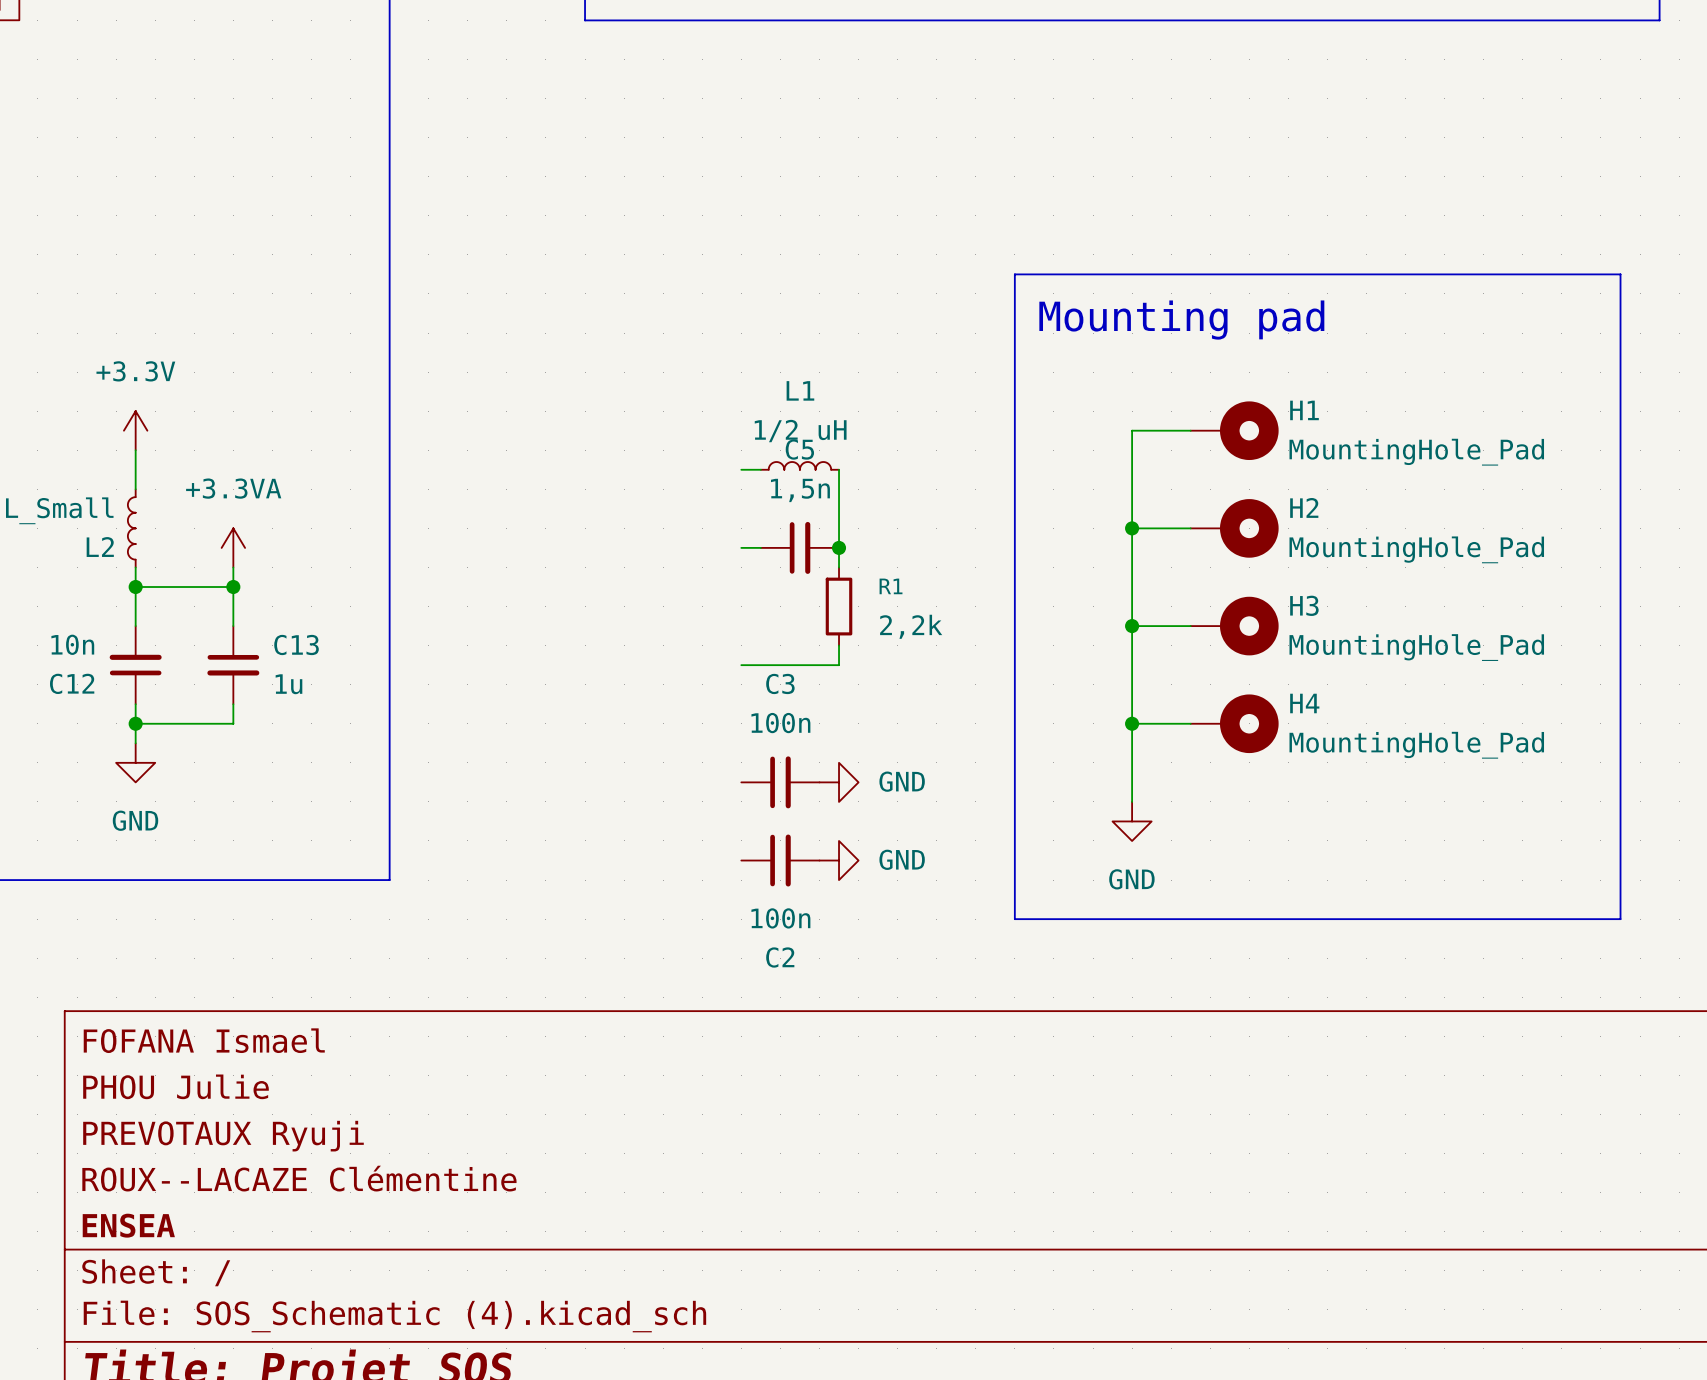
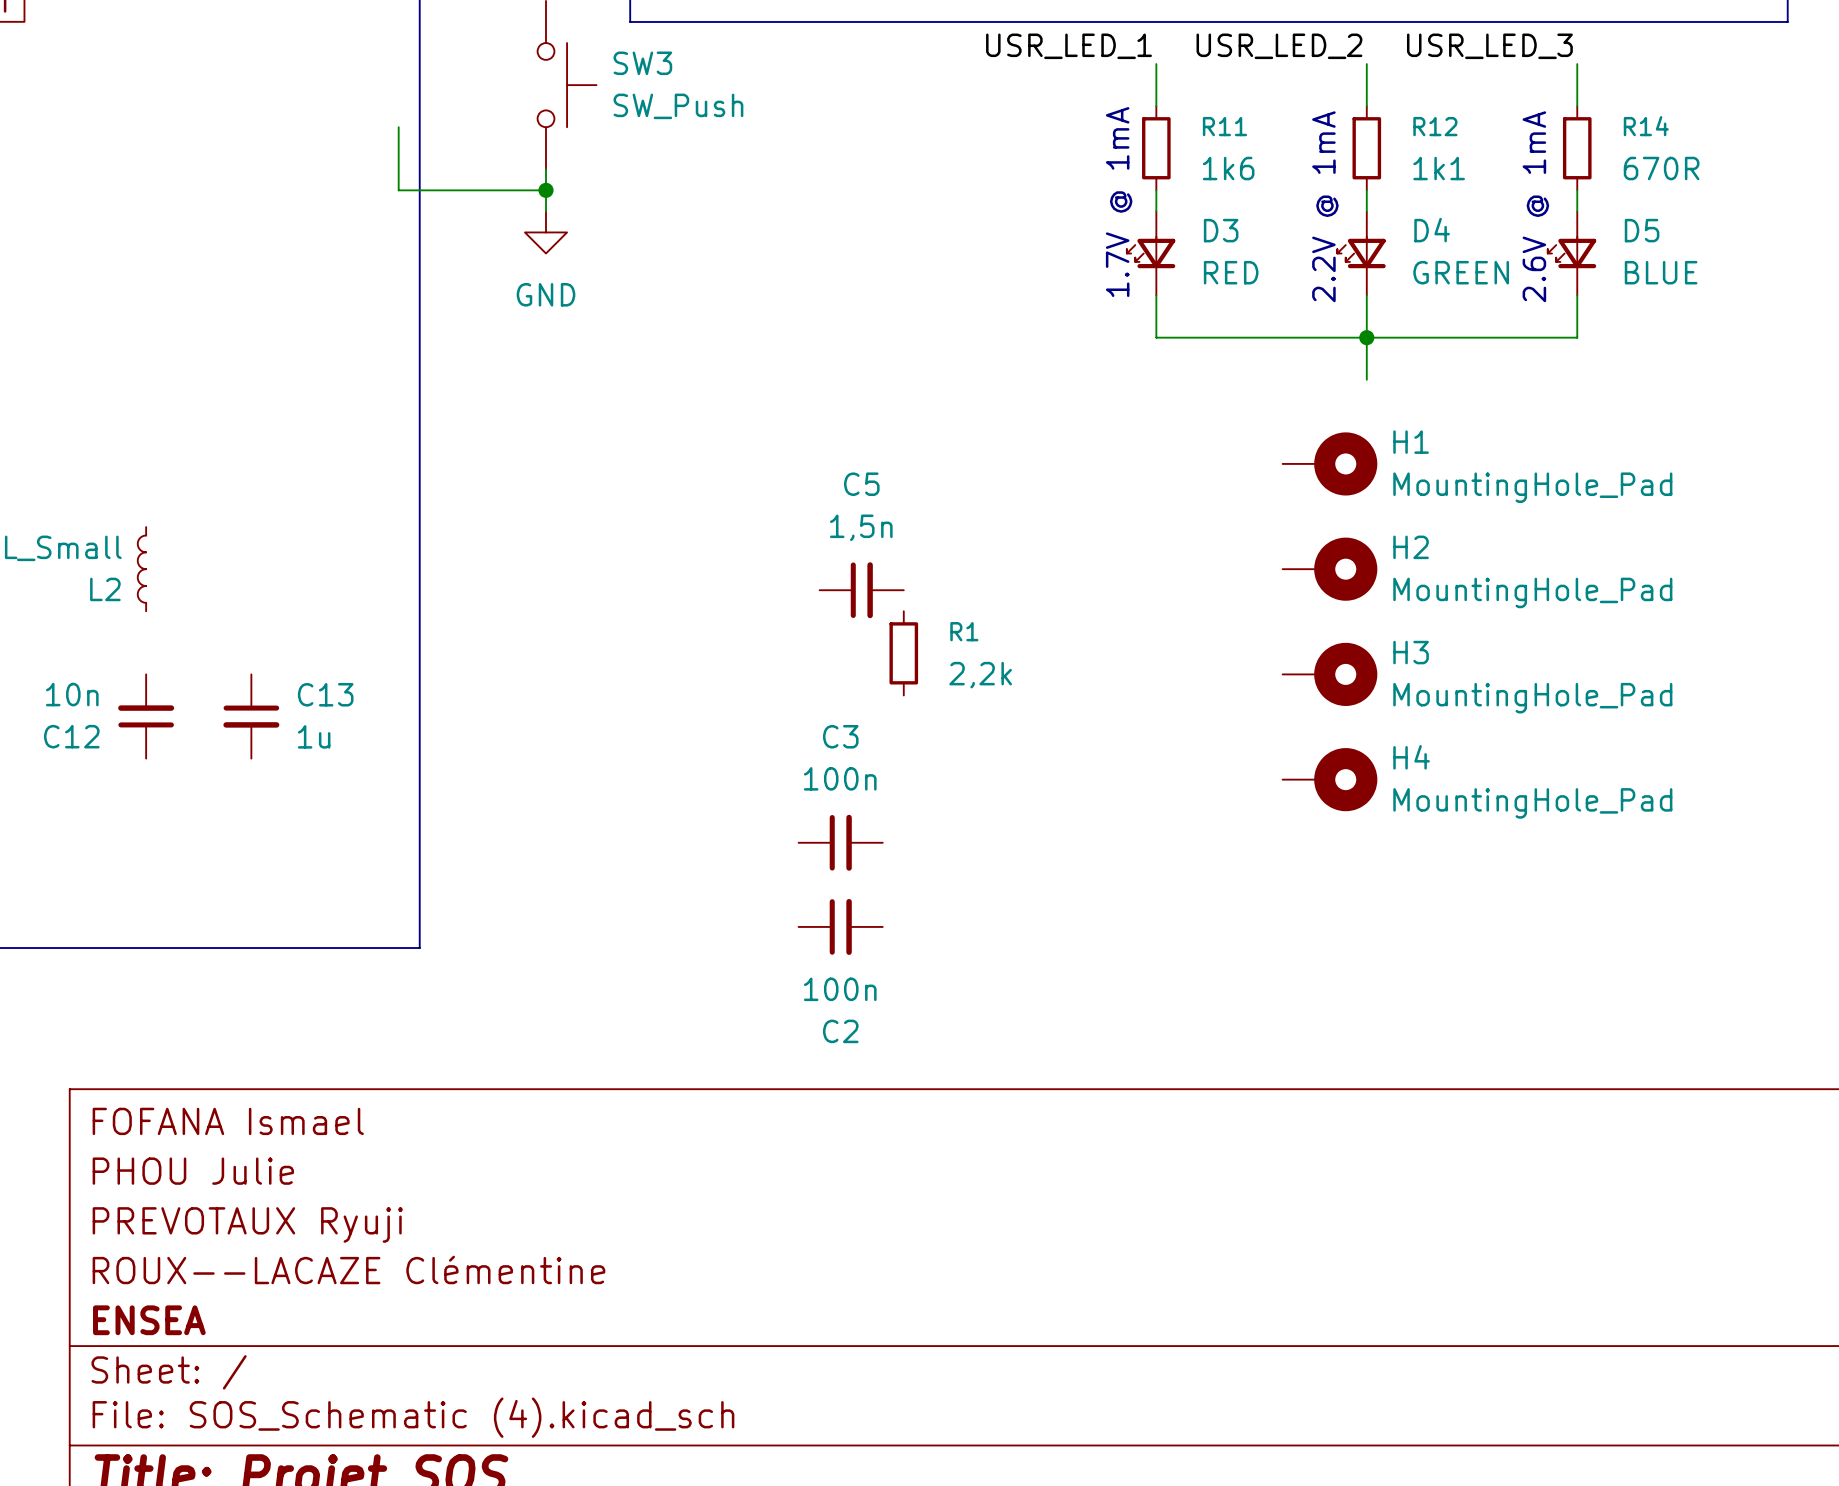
label: none -> USR_LED_1 (1068, 46)
label: none -> USR_LED_2 (1279, 46)
label: none -> USR_LED_3 (1489, 46)
wire: none -> (1156, 64) (1156, 106)
wire: none -> (1366, 64) (1366, 106)
wire: none -> (1577, 64) (1577, 106)
SW3: none -> SW_Push (567, 85)
wire: none -> (398, 127) (398, 190) (546, 190)
R11: none -> 1k6 (1156, 148)
R12: none -> 1k1 (1366, 148)
R14: none -> 670R (1577, 148)
wire: none -> (546, 169) (546, 211)
junction: none -> (546, 190)
wire: none -> (1156, 190) (1156, 211)
wire: none -> (1366, 190) (1366, 211)
wire: none -> (1577, 190) (1577, 211)
text: none -> 1.7V @ 1mA (1119, 202)
text: none -> 2.2V @ 1mA (1325, 206)
text: none -> 2.6V @ 1mA (1535, 206)
power symbol: none -> GND (546, 232)
D3: none -> RED (1151, 253)
D4: none -> GREEN (1361, 253)
D5: none -> BLUE (1572, 253)
line: (1014, 274) (1620, 274) (1620, 919) (1014, 919) (1014, 274) -> none
wire: none -> (1156, 295) (1156, 337) (1577, 337) (1577, 295)
wire: none -> (1366, 295) (1366, 379)
junction: none -> (1366, 337)
text: Mounting pad (1181, 320) -> none
power symbol: +3.3V (135, 430) -> none
wire: (1190, 430) (1132, 430) (1132, 801) -> none
wire: (135, 450) (135, 489) -> none
L1: 1/2 uH (799, 465) -> none
wire: (741, 469) (760, 469) -> none
wire: (839, 469) (839, 567) -> none
wire: (1132, 528) (1190, 528) -> none
junction: (1132, 528) -> none
power symbol: +3.3VA (233, 547) -> none
wire: (741, 547) (760, 547) -> none
junction: (839, 547) -> none
wire: (135, 567) (135, 626) -> none
wire: (233, 567) (233, 626) -> none
wire: (135, 587) (233, 587) -> none
junction: (135, 587) -> none
junction: (233, 587) -> none
wire: (1132, 626) (1190, 626) -> none
junction: (1132, 626) -> none
wire: (839, 645) (839, 665) (741, 665) -> none
wire: (135, 704) (135, 743) -> none
wire: (233, 704) (233, 723) (135, 723) -> none
junction: (135, 723) -> none
wire: (1132, 723) (1190, 723) -> none
junction: (1132, 723) -> none
power symbol: GND (135, 762) -> none
power symbol: GND (839, 782) -> none
power symbol: GND (1132, 821) -> none
power symbol: GND (839, 860) -> none

